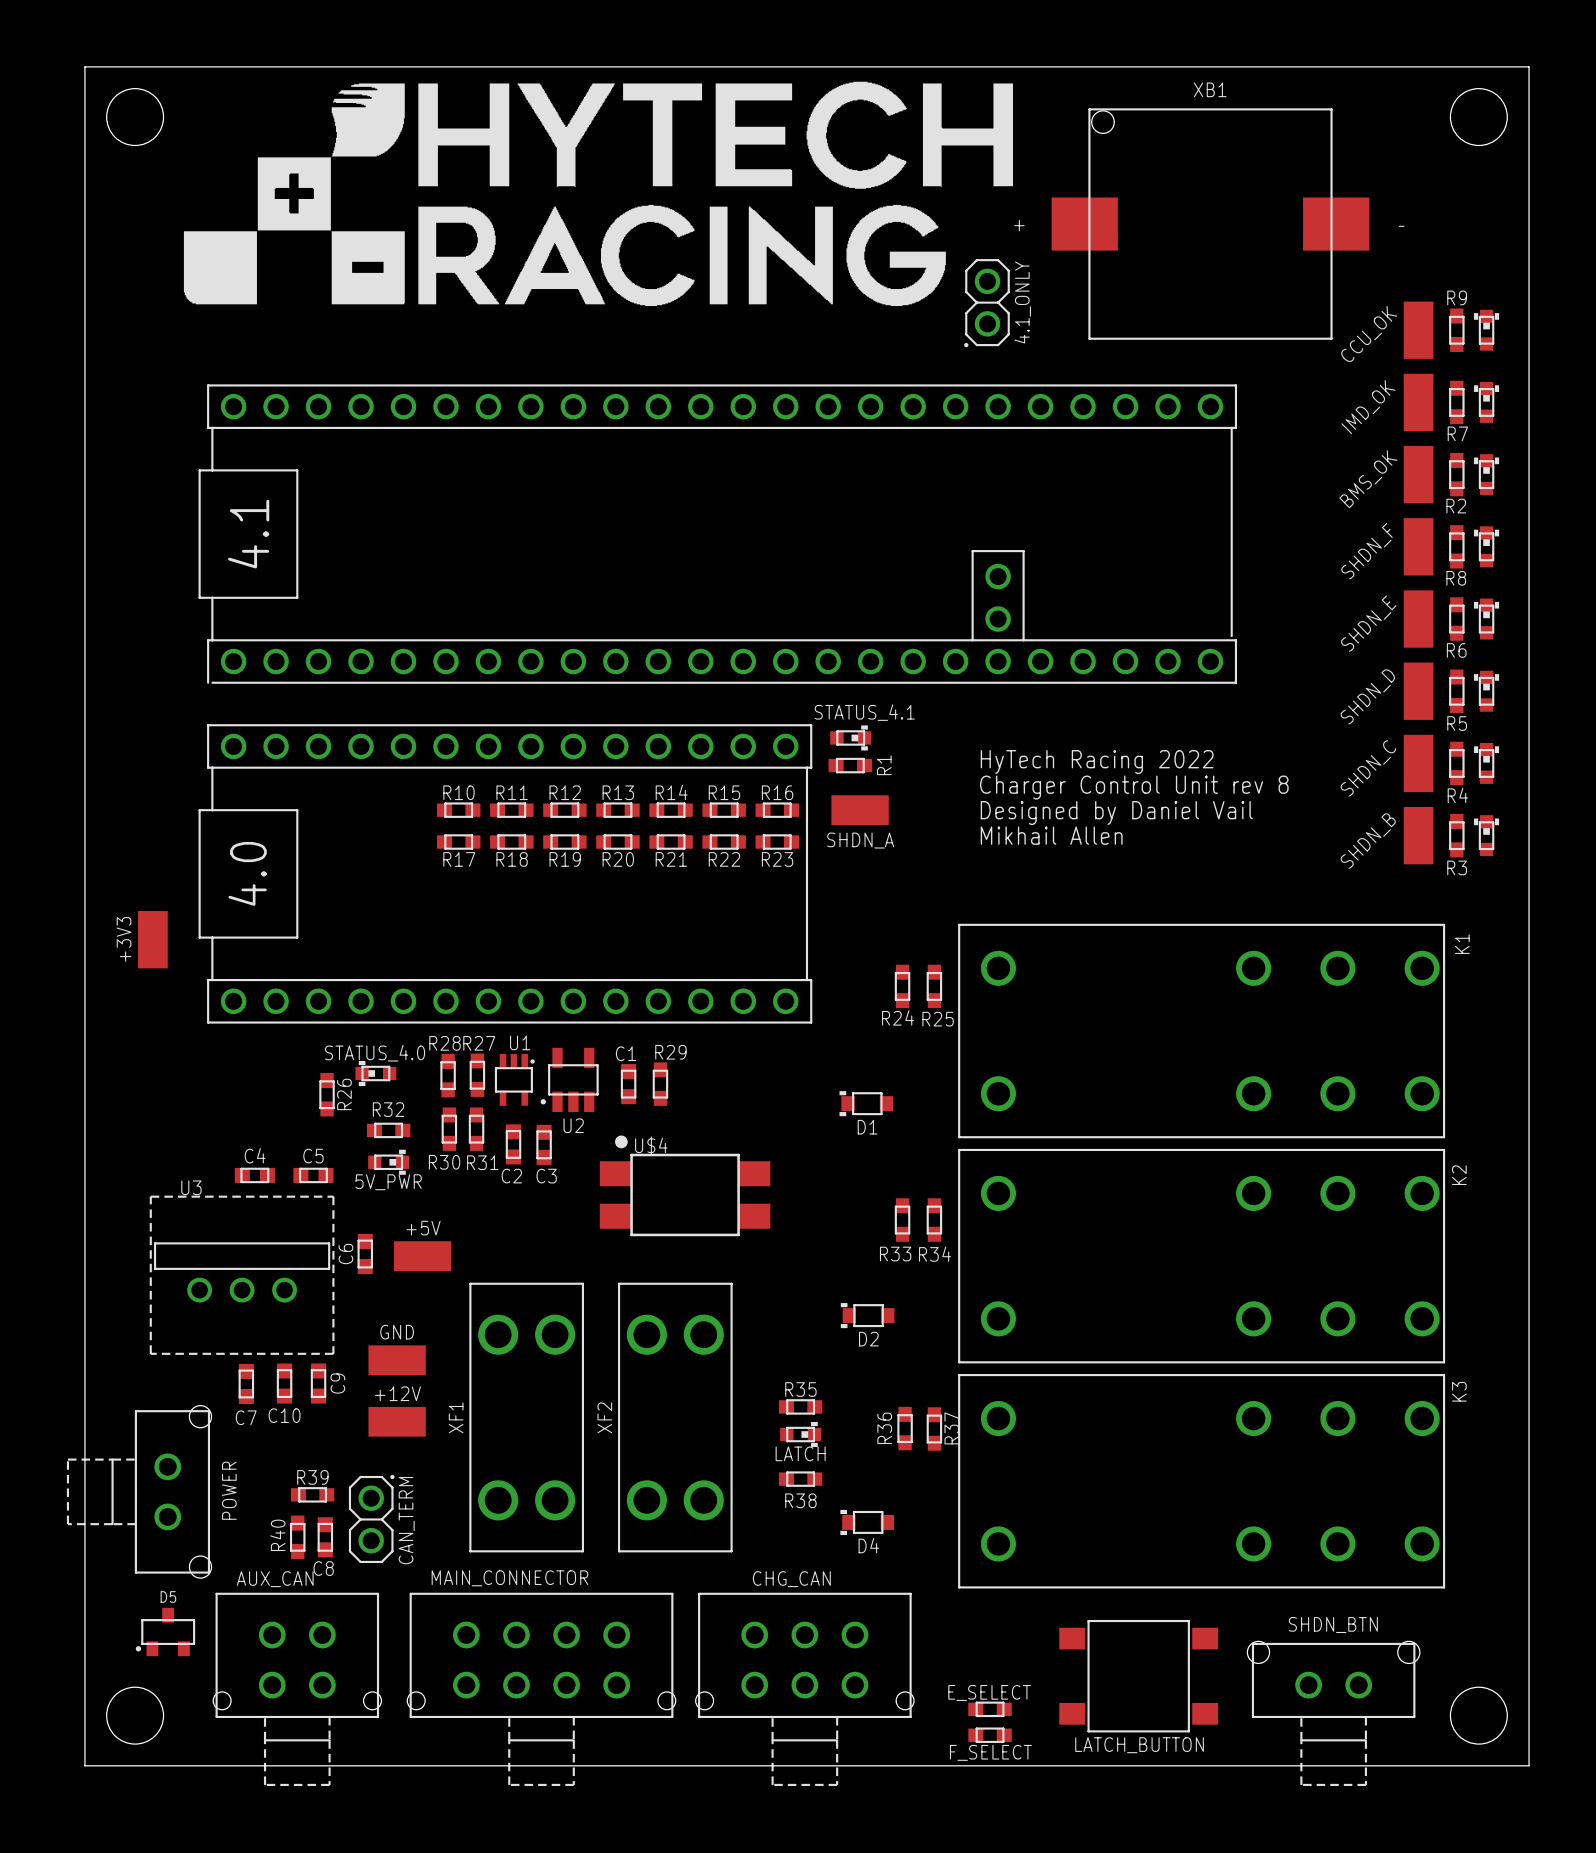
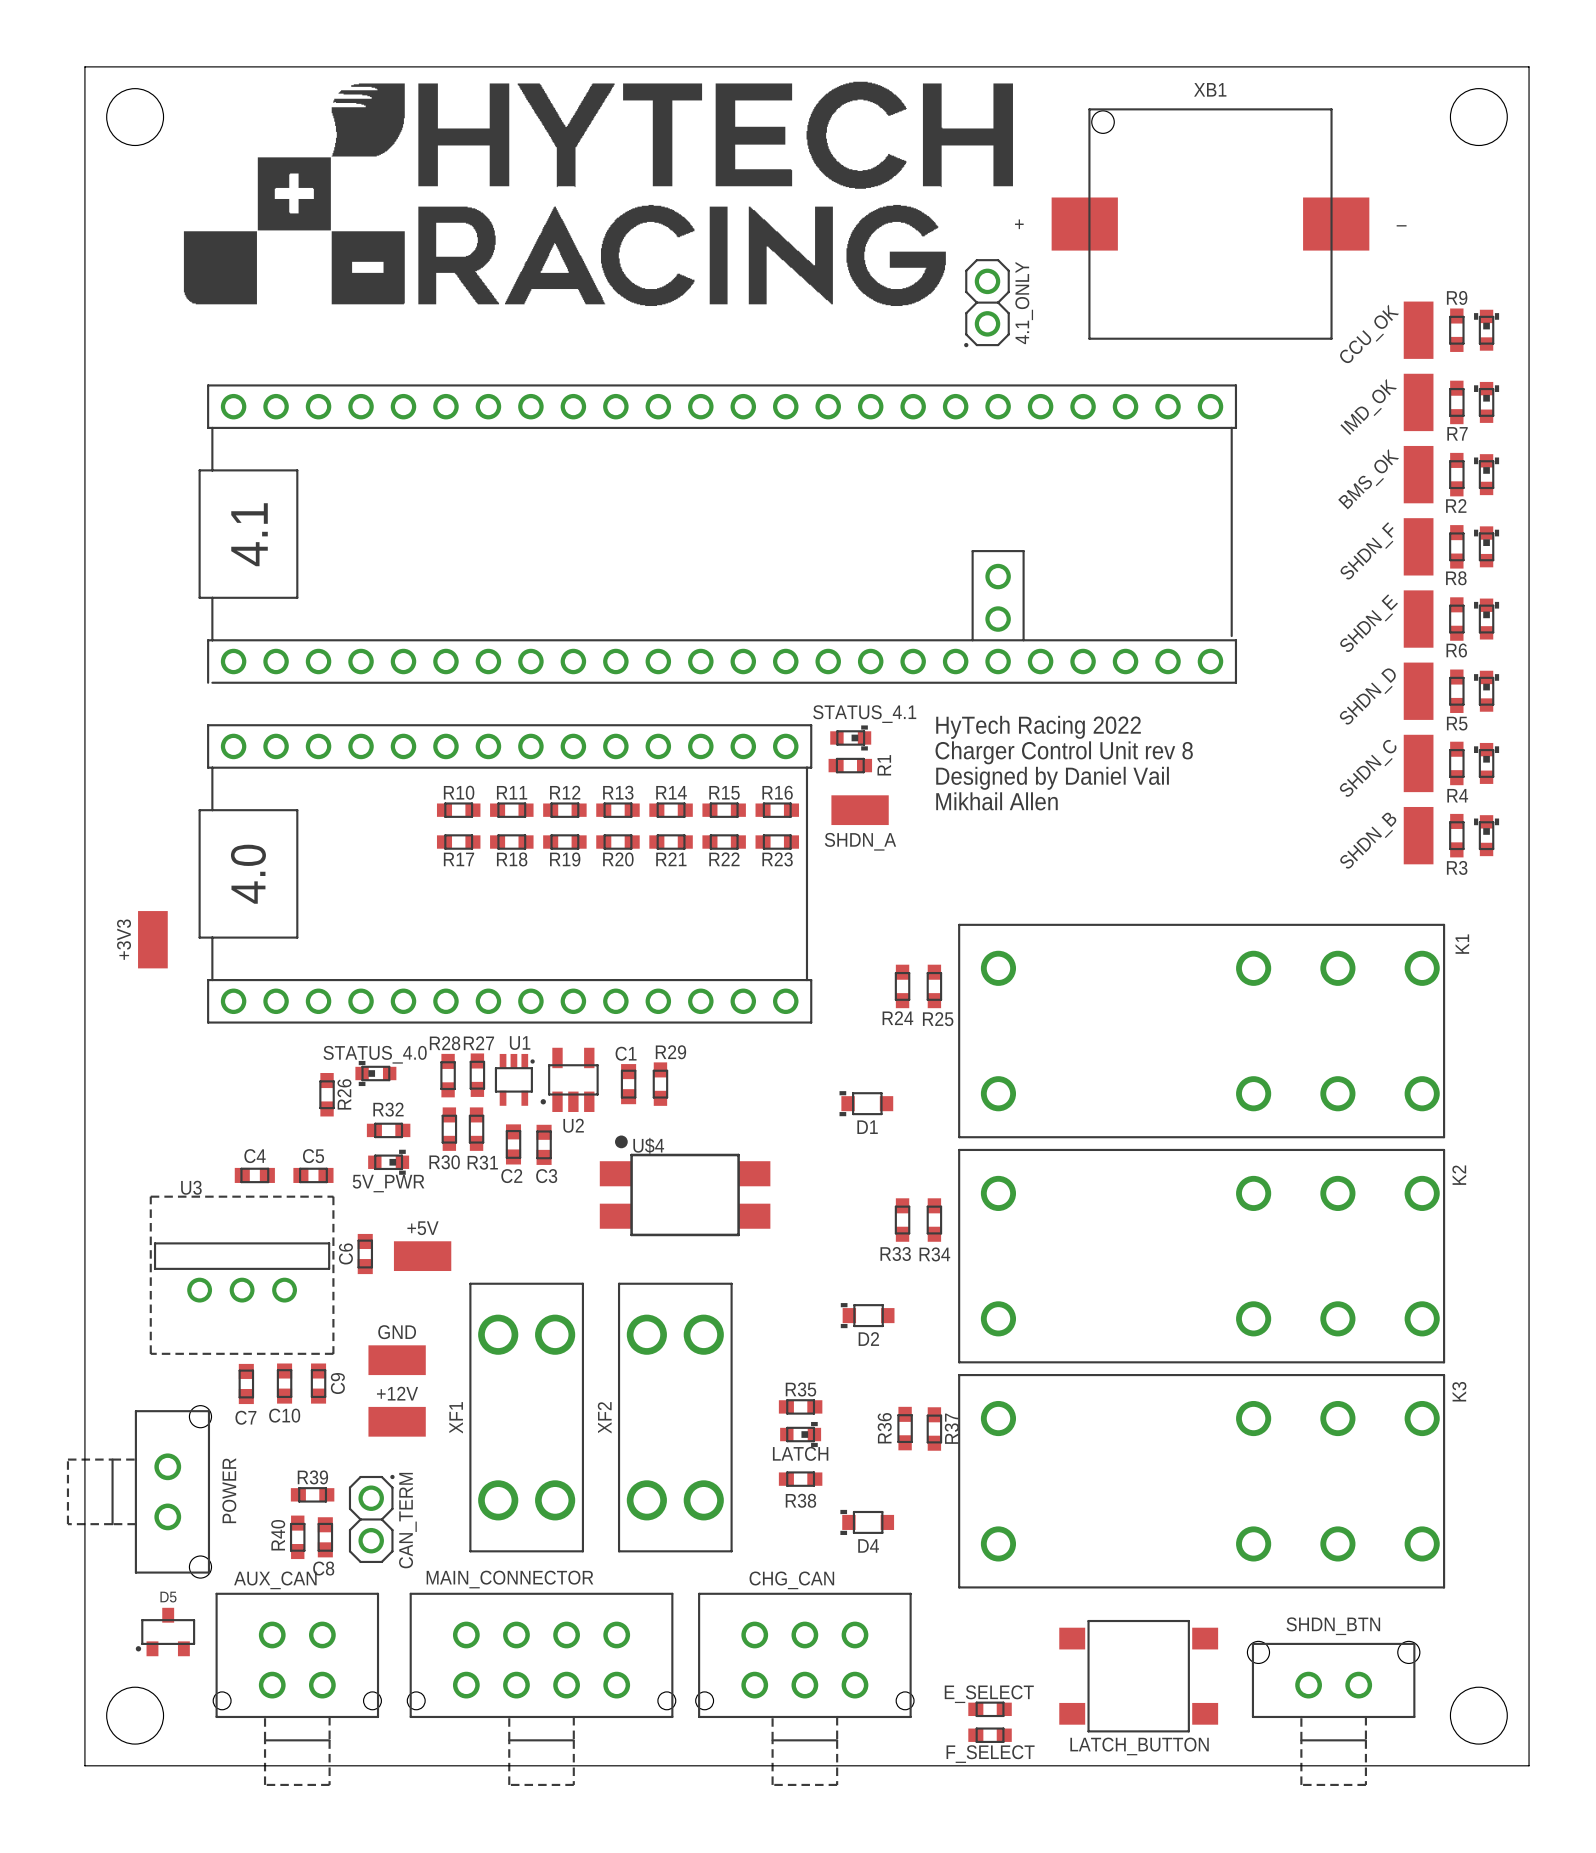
text position: HyTech Racing 2022 (1097, 762) -> HyTech Racing 2022 (1038, 727)
text position: Charger Control Unit rev 8 (1134, 787) -> Charger Control Unit rev 8 (1064, 752)
text position: Designed by Daniel Vail (1116, 813) -> Designed by Daniel Vail (1052, 778)
text position: Mikhail Allen (1051, 835) -> Mikhail Allen (996, 801)

